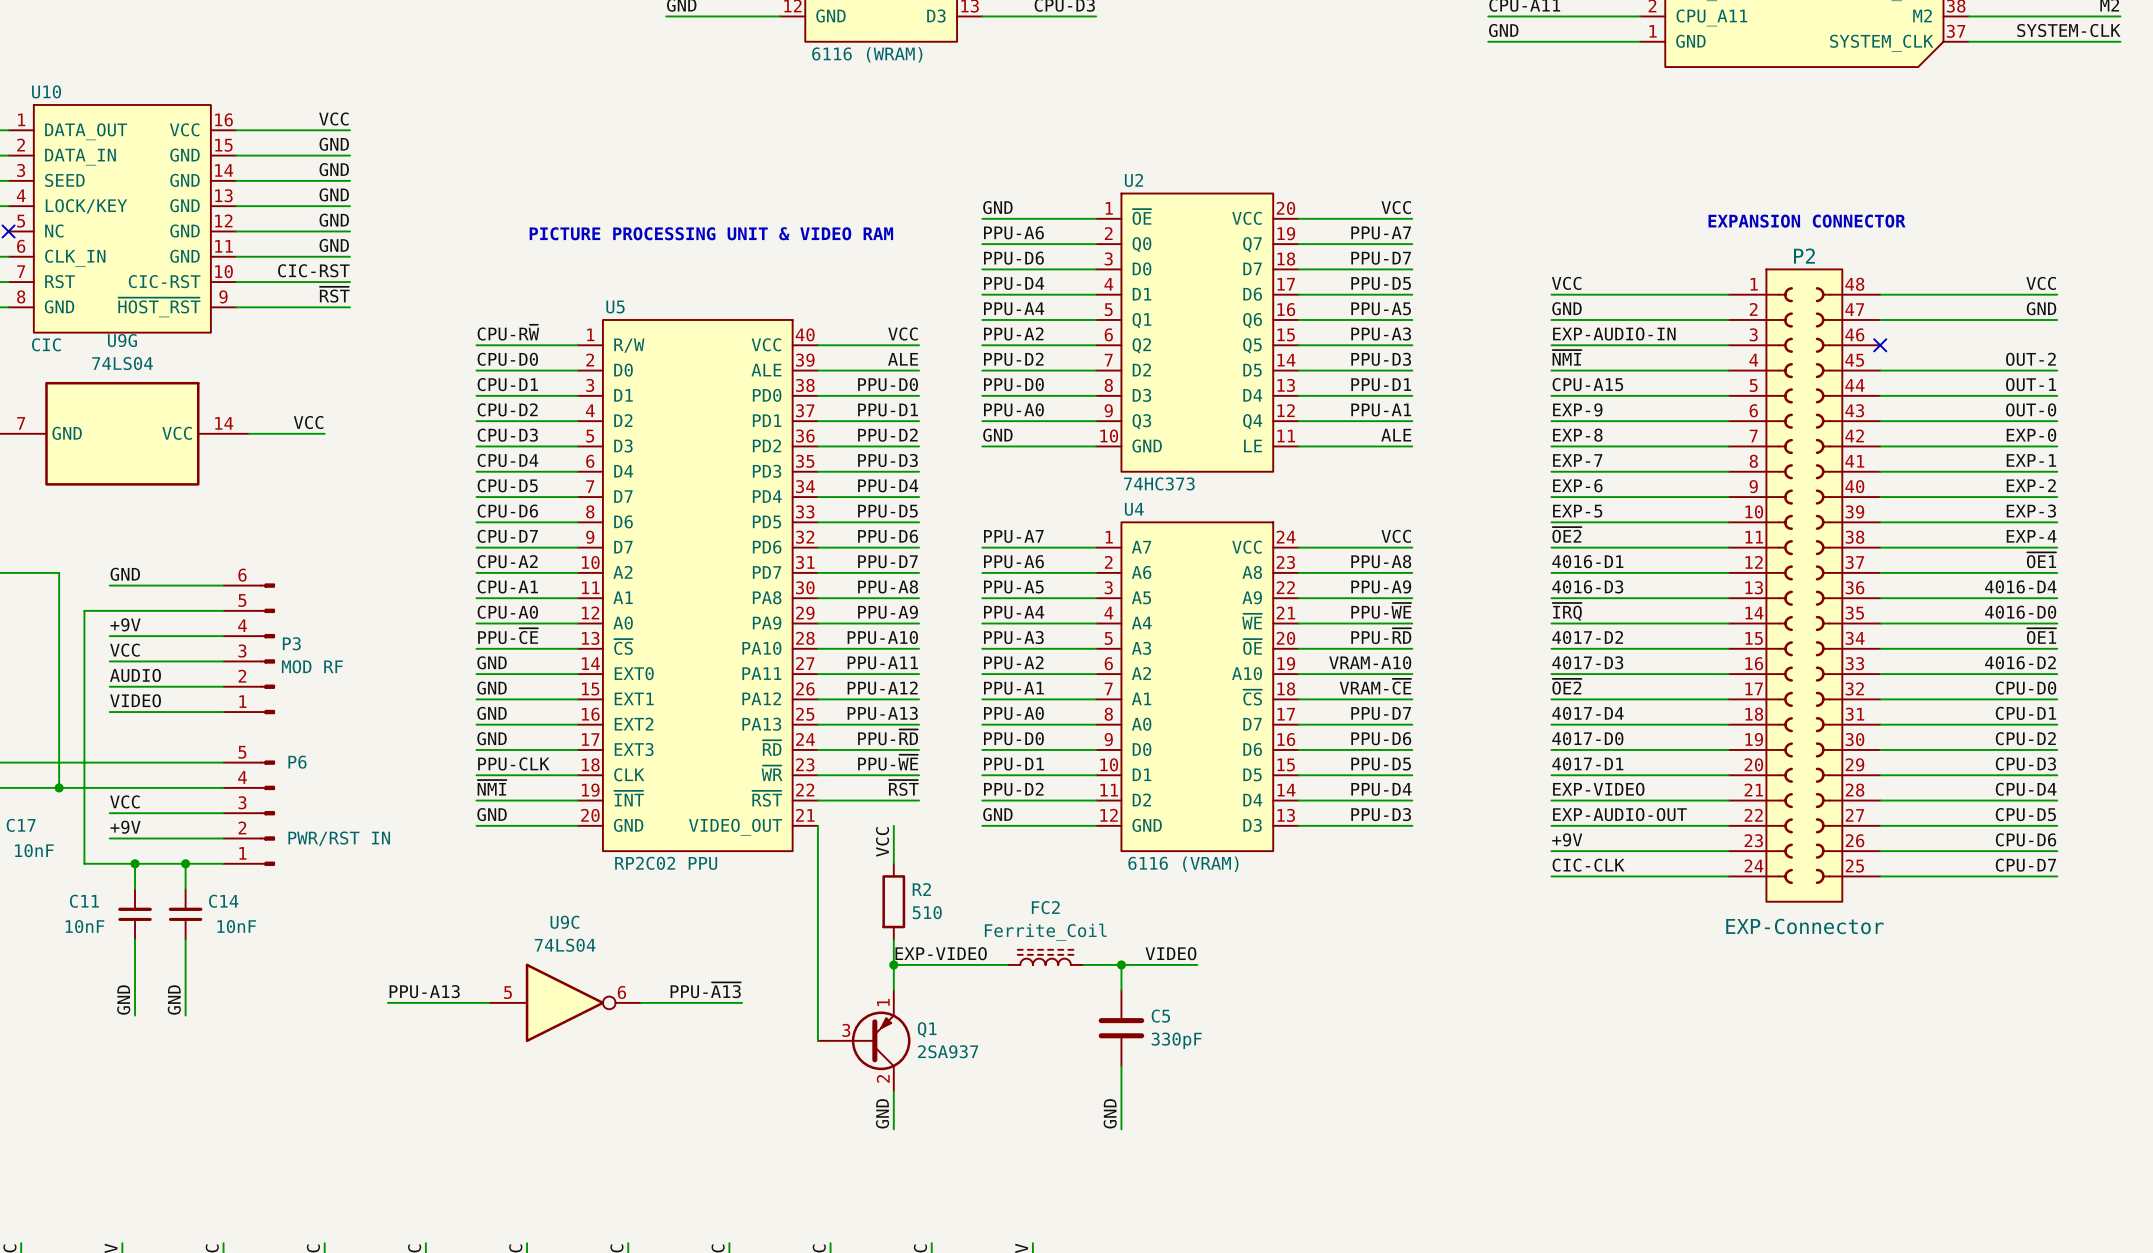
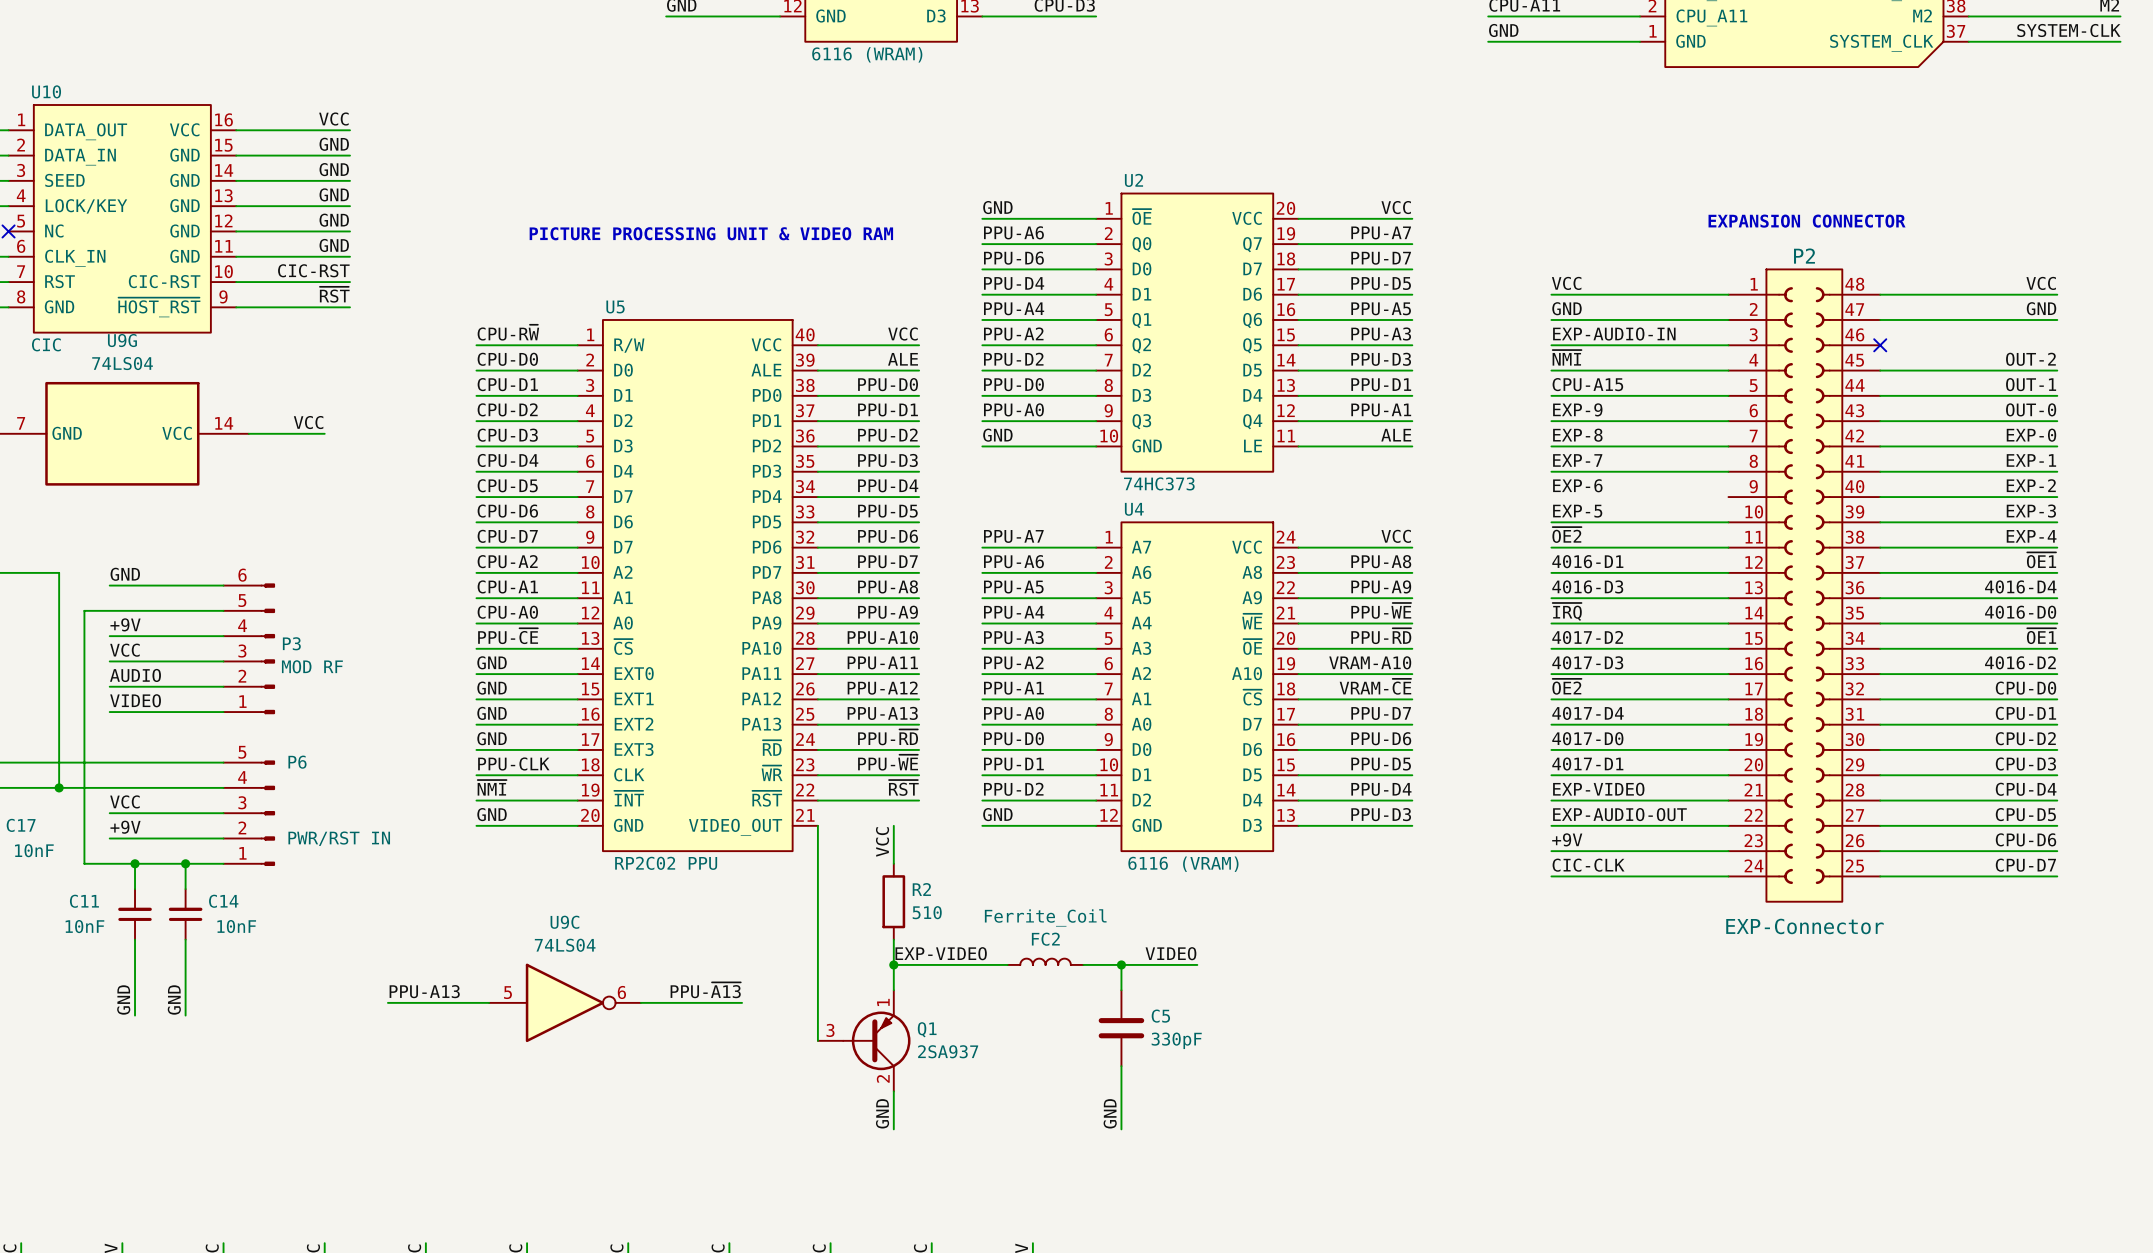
wire: (1551, 497) (1728, 497) -> none
FC2 name position: FC2 (1045, 907) -> FC2 (1045, 939)
FC2 symbol: [1007, 949, 1084, 965] -> [1007, 958, 1084, 965]
Q1 symbol: [817, 990, 911, 1092] -> [817, 990, 911, 1092]

